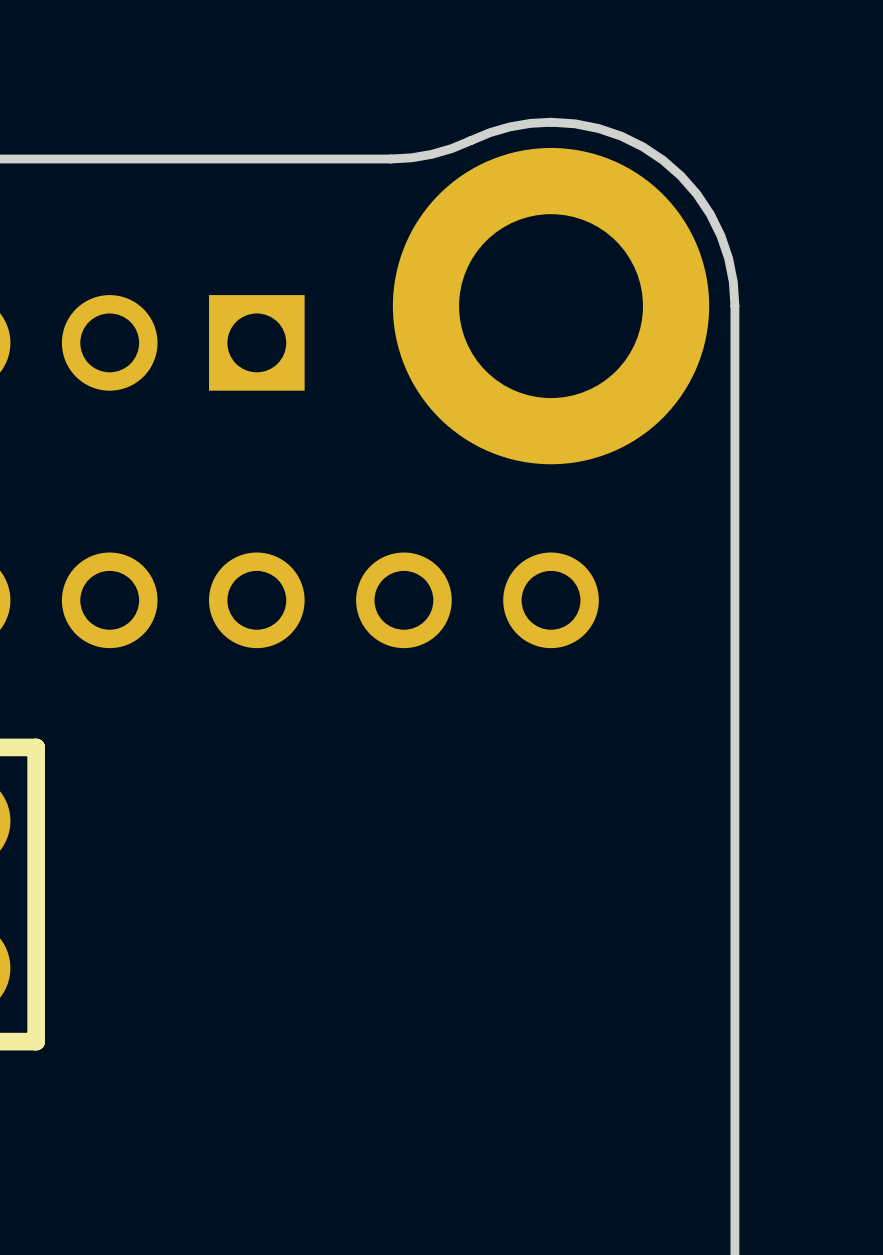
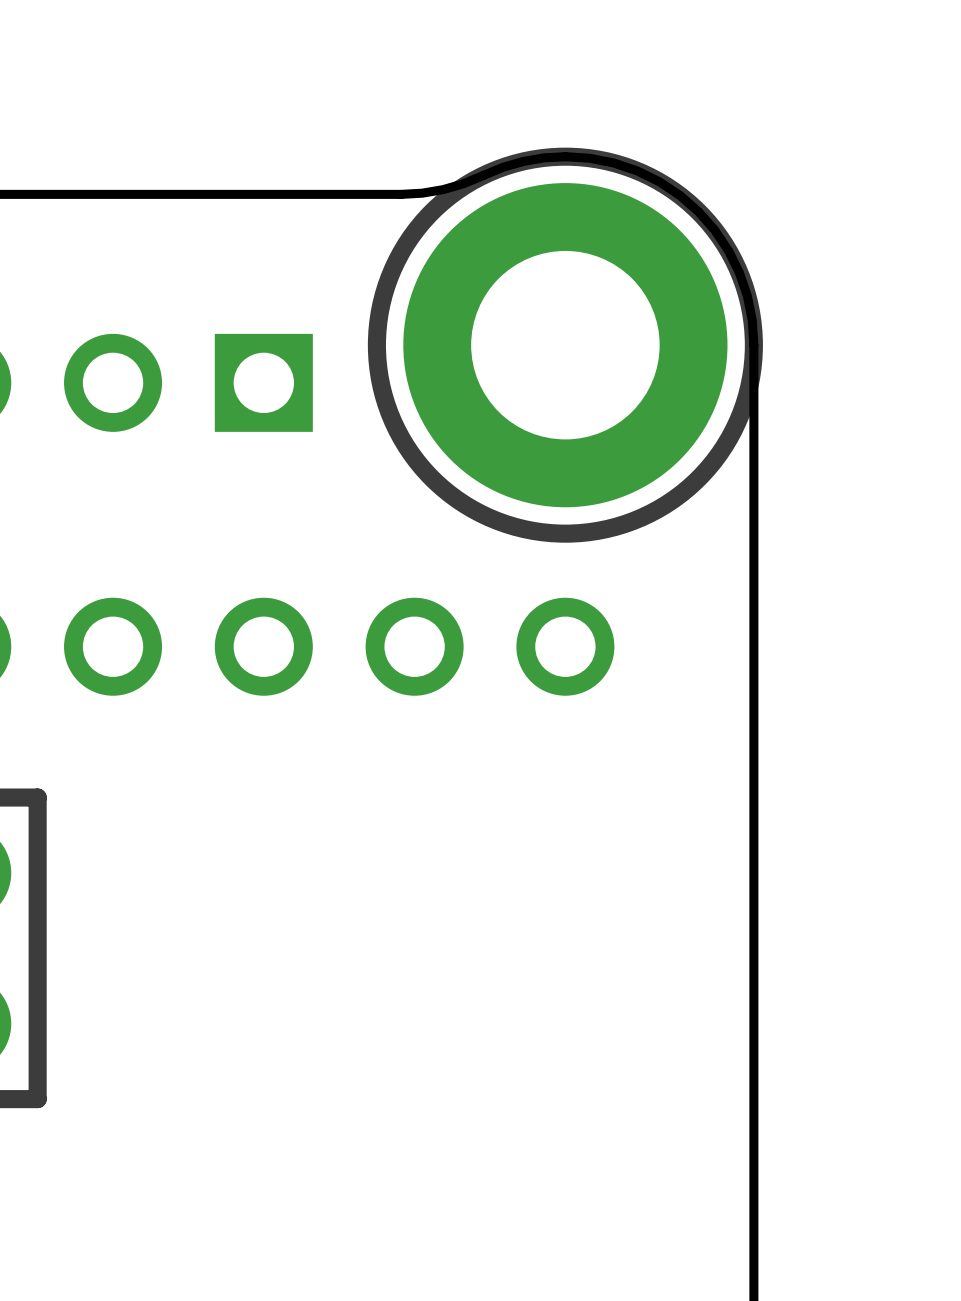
drawing: none -> [367, 147, 763, 543]

